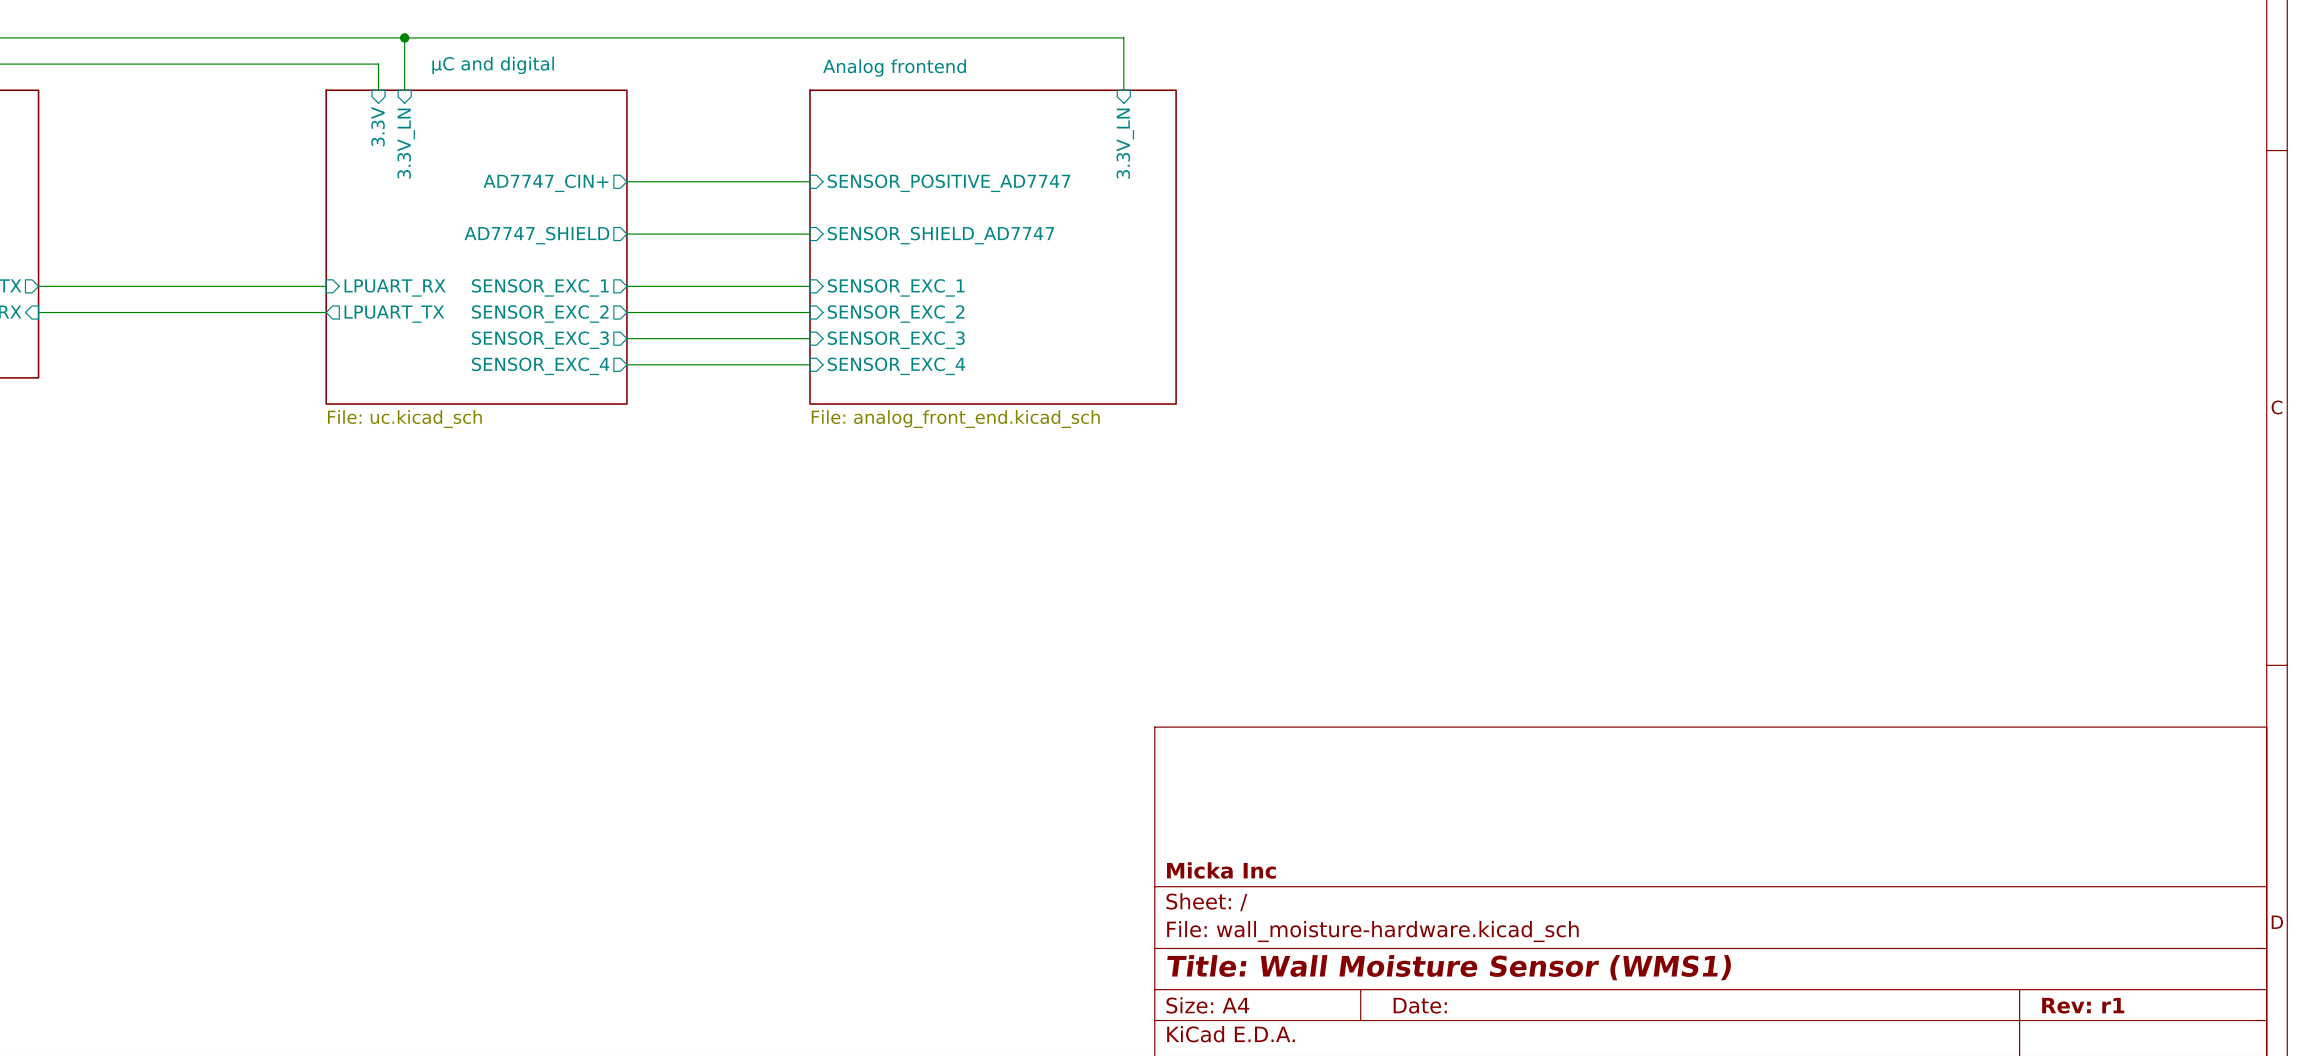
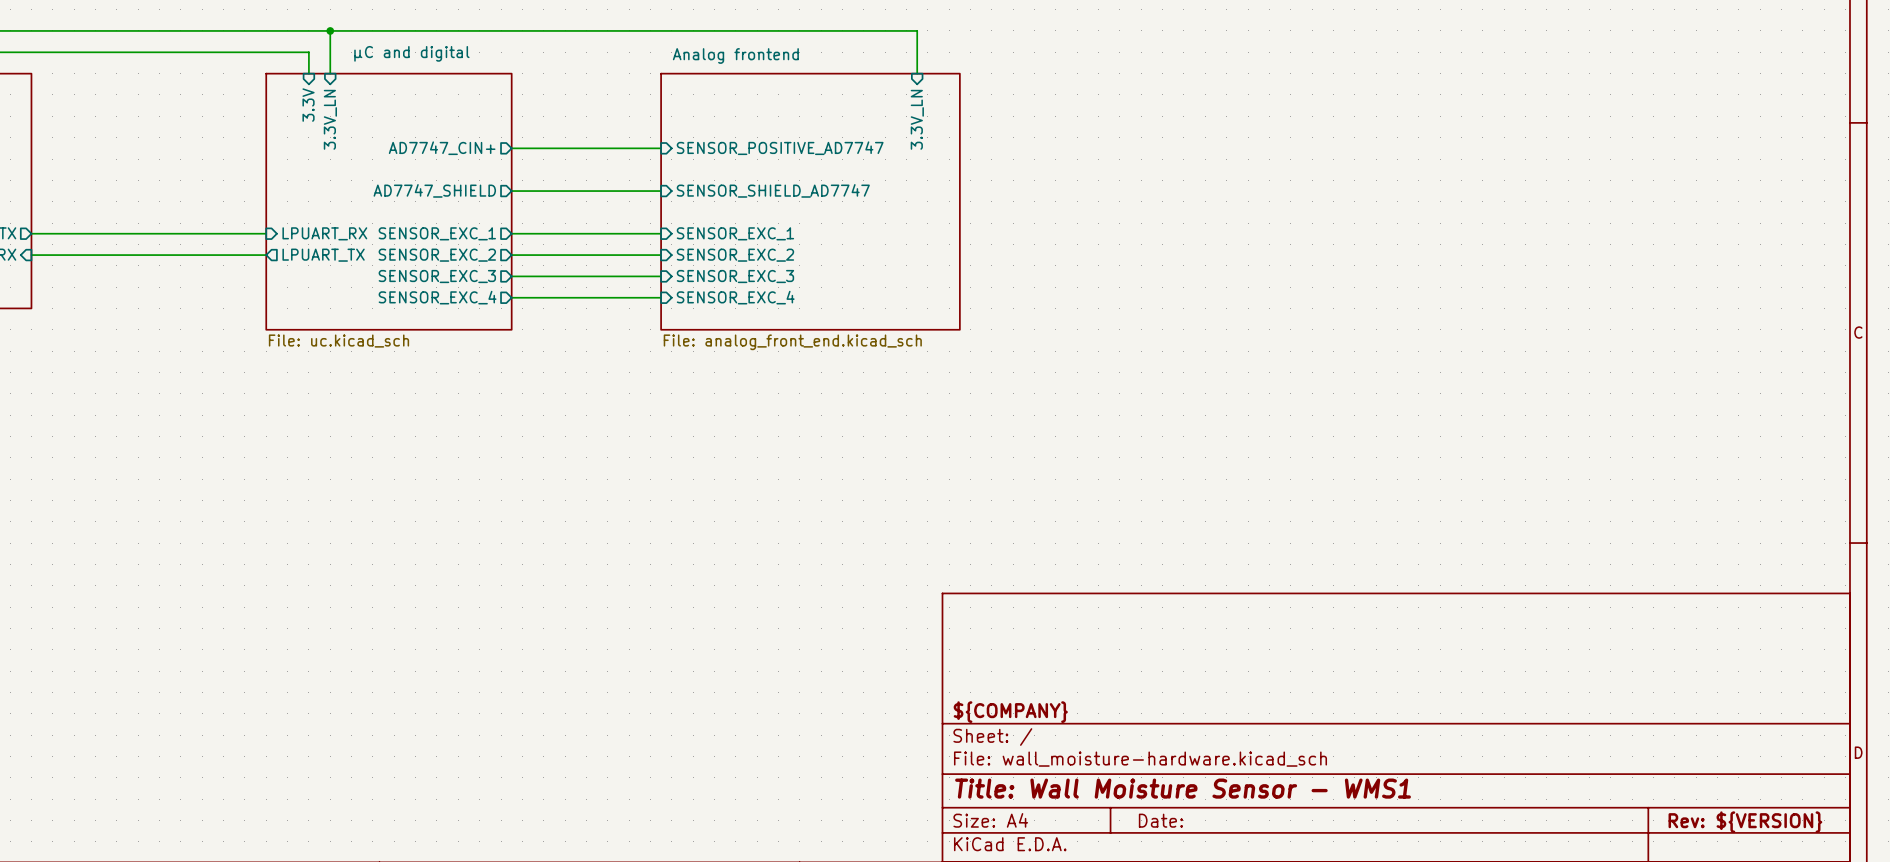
title block: Micka Inc (1221, 870) -> ${COMPANY} (1010, 712)
title block: Title: Wall Moisture Sensor (WMS1) (1449, 967) -> Title: Wall Moisture Sensor - WMS1 (1183, 788)
title block: Rev: r1 (2083, 1005) -> Rev: ${VERSION} (1745, 822)

